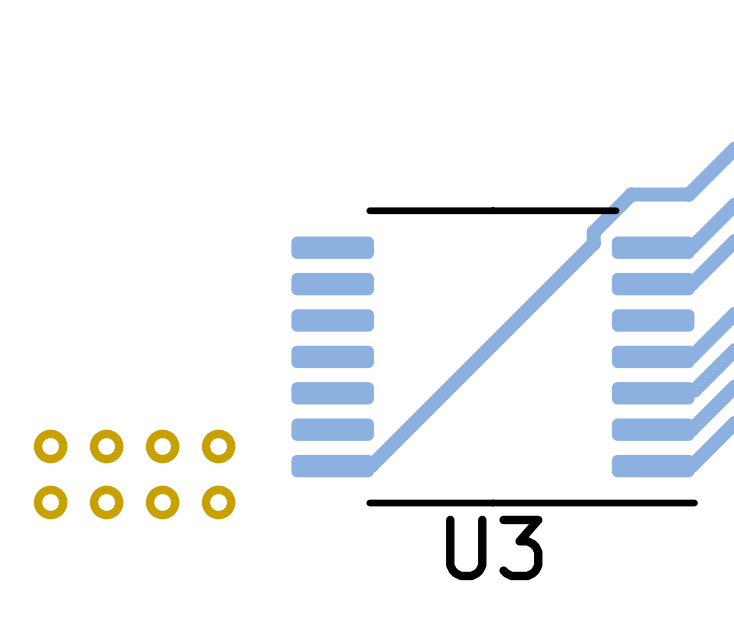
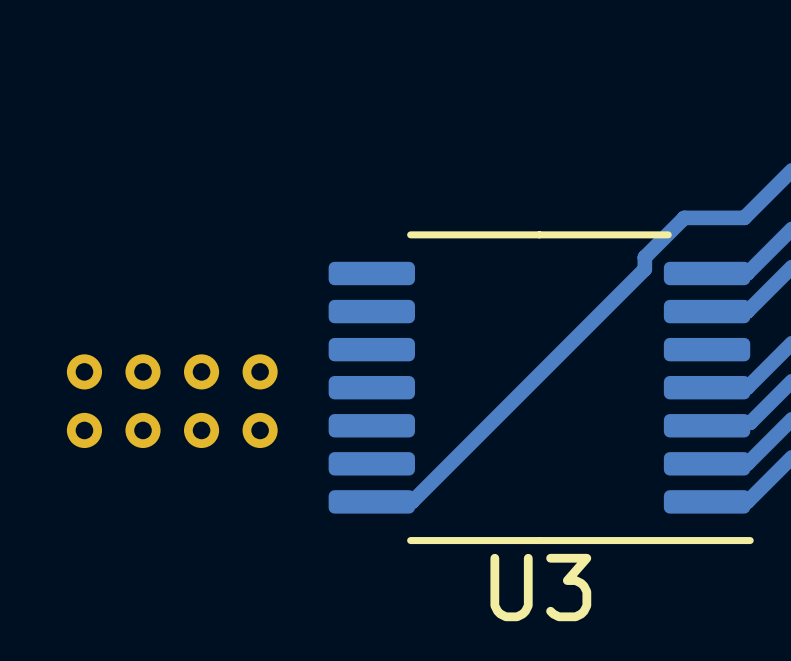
part position: (134, 474) -> (172, 401)

